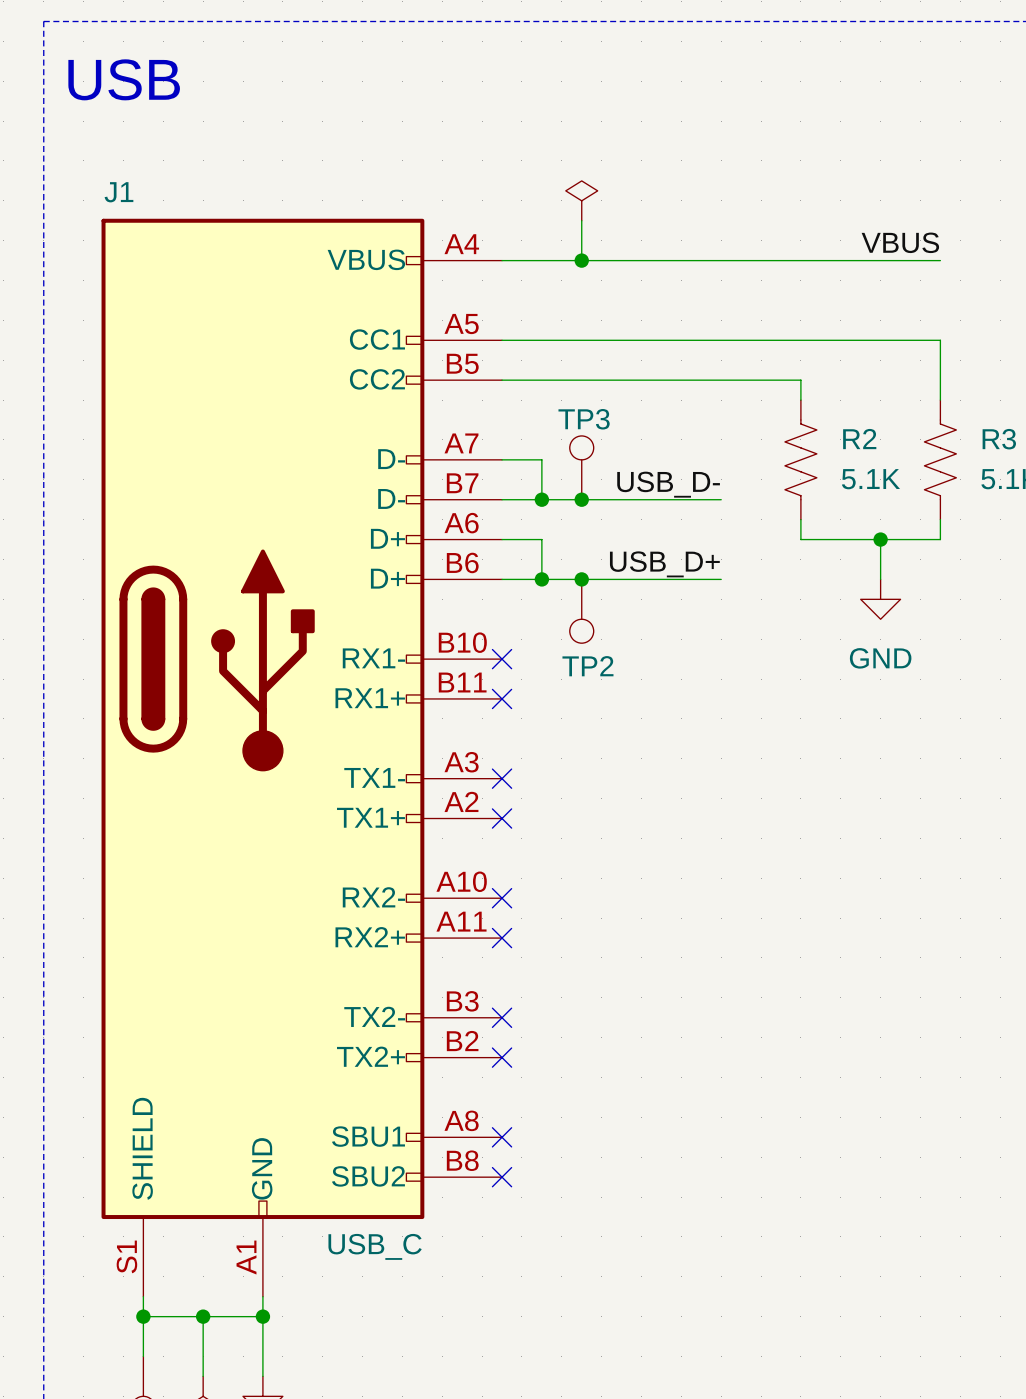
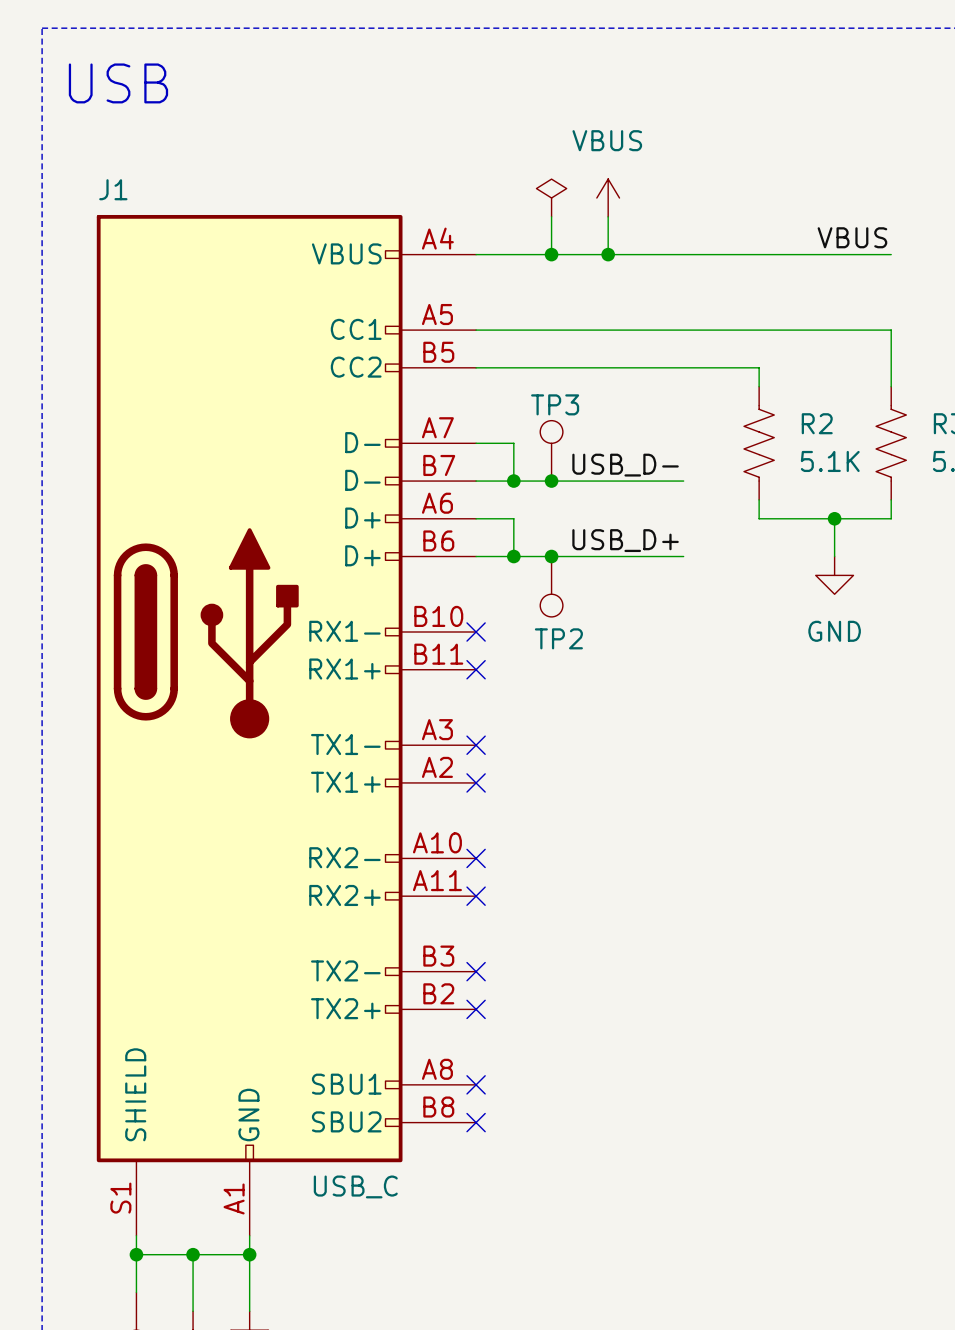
power symbol: none -> VBUS (608, 198)
wire: none -> (608, 216) (608, 254)
junction: none -> (608, 254)

